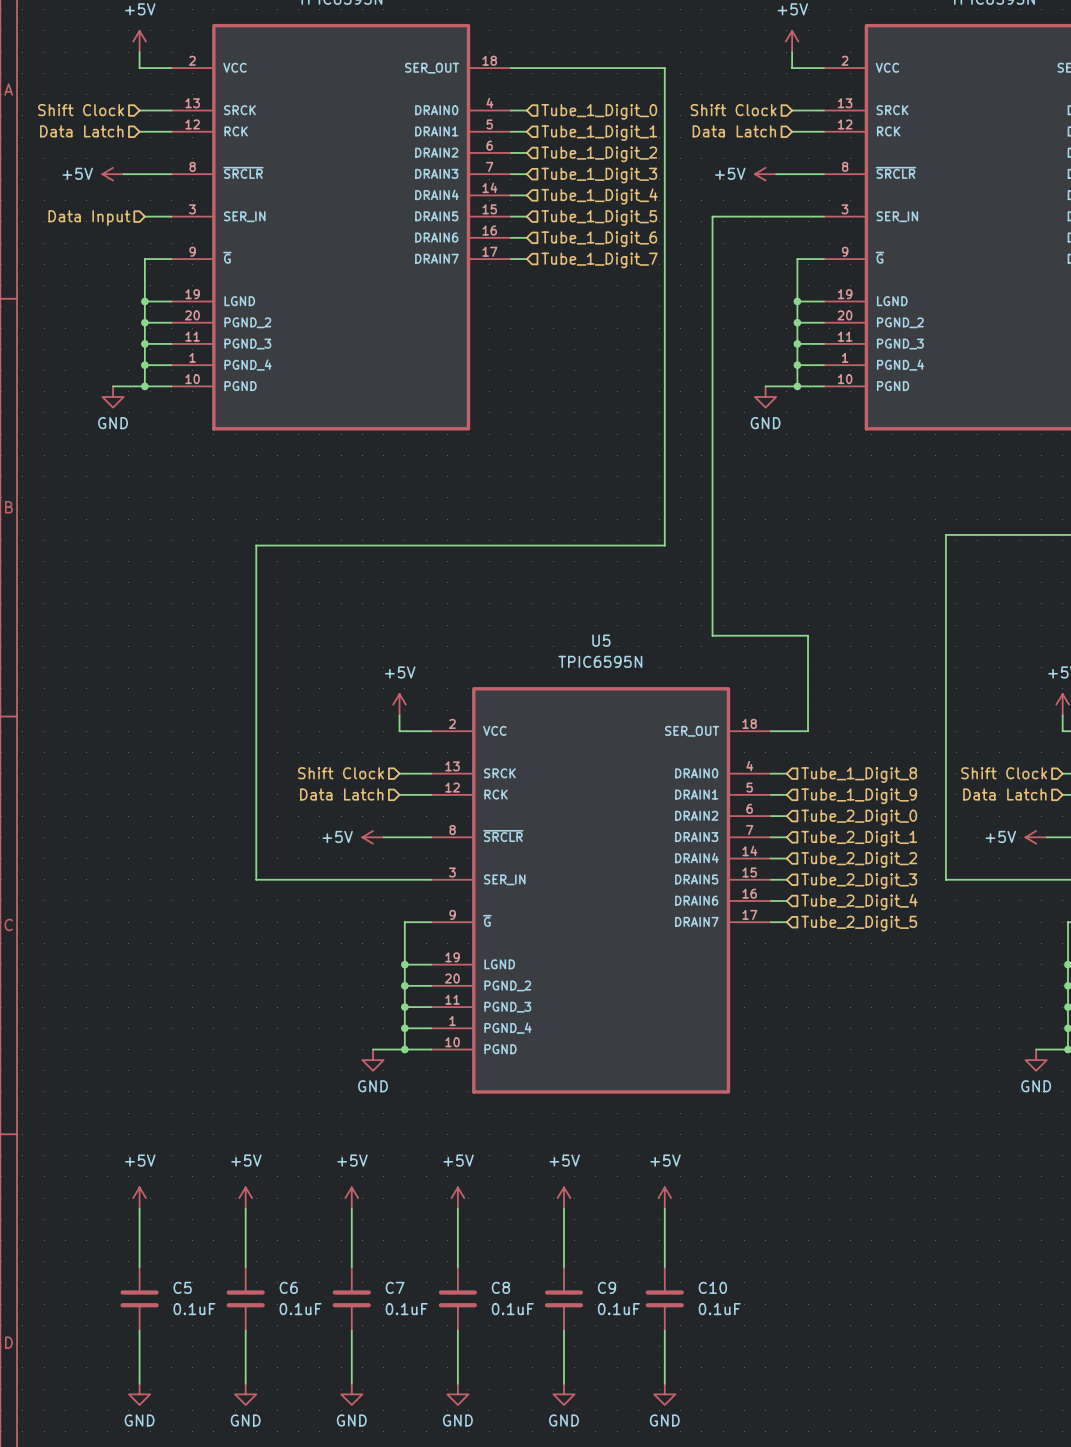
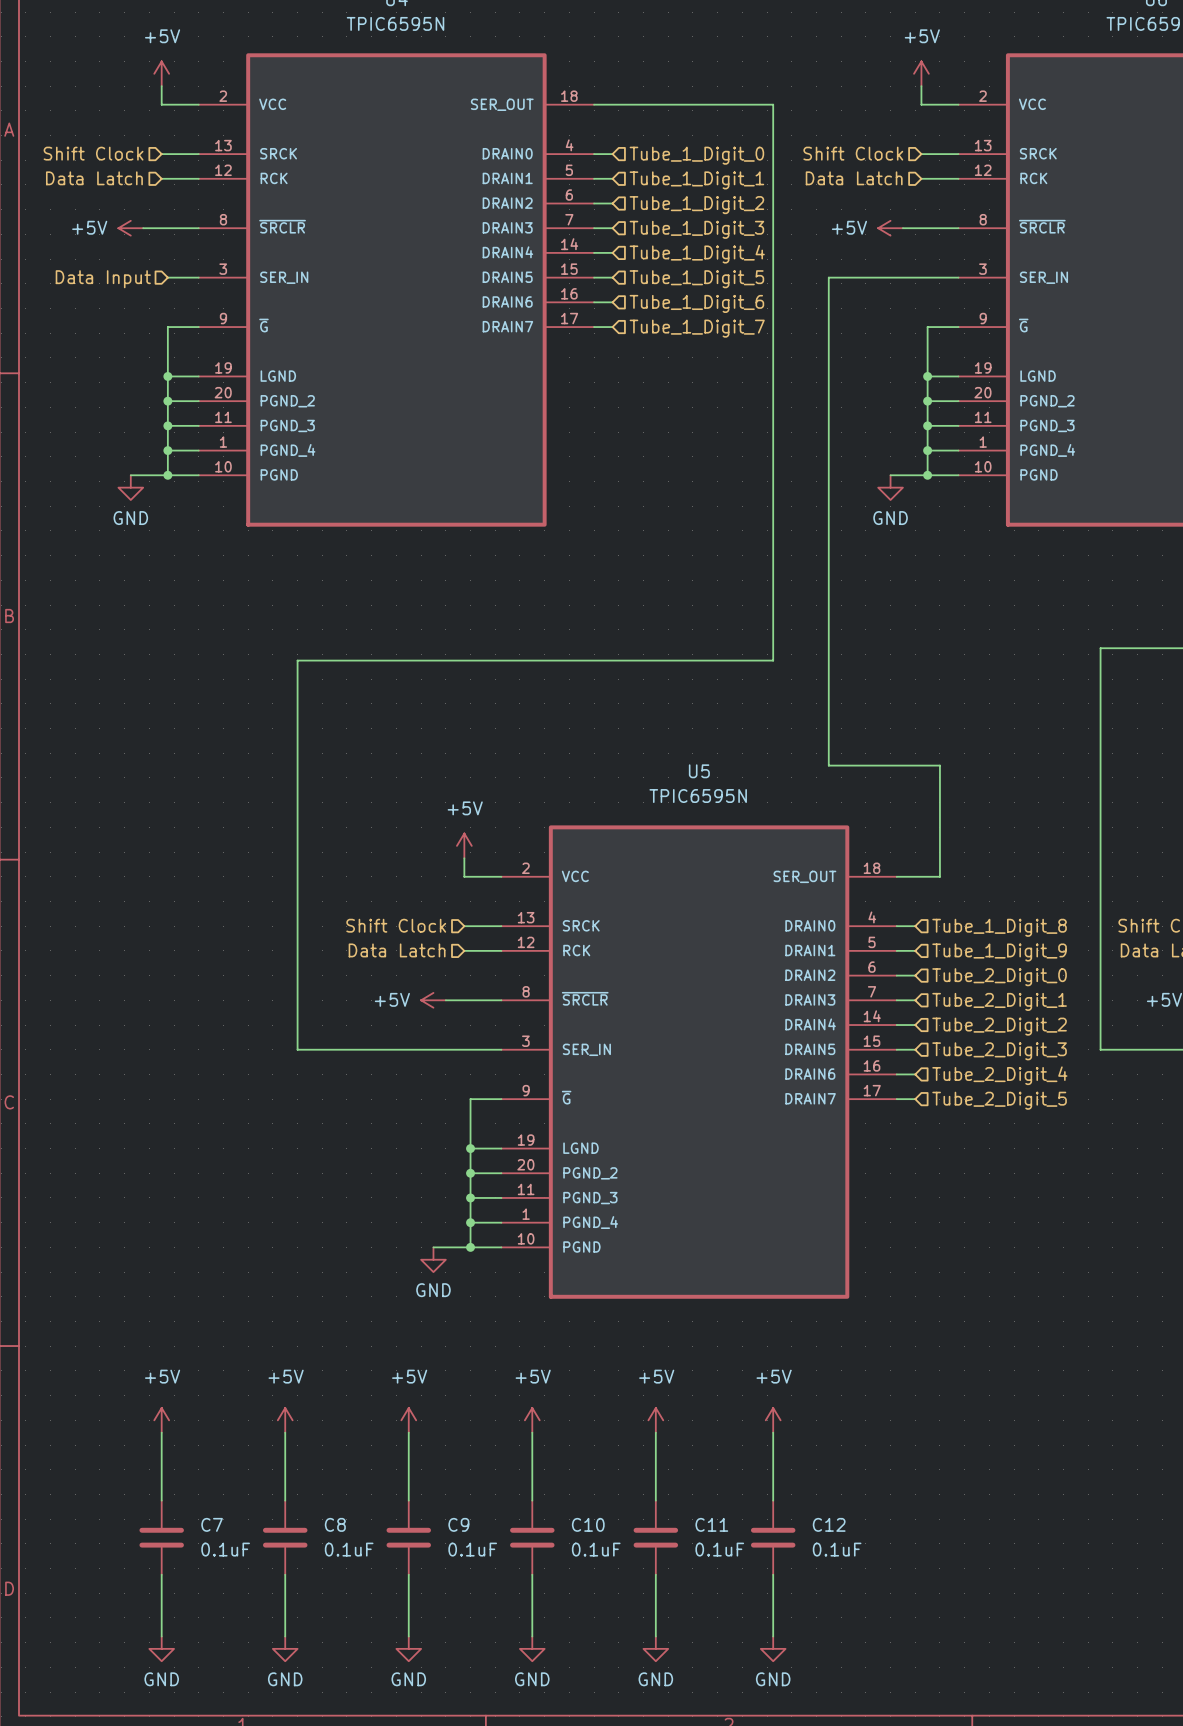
C5 name: C5 (182, 1287) -> C7 (212, 1524)
C6 name: C6 (288, 1287) -> C8 (335, 1524)
C7 name: C7 (395, 1287) -> C9 (458, 1524)
C8 name: C8 (500, 1287) -> C10 (588, 1524)
C9 name: C9 (607, 1287) -> C11 (711, 1524)
C10 name: C10 (712, 1287) -> C12 (829, 1524)

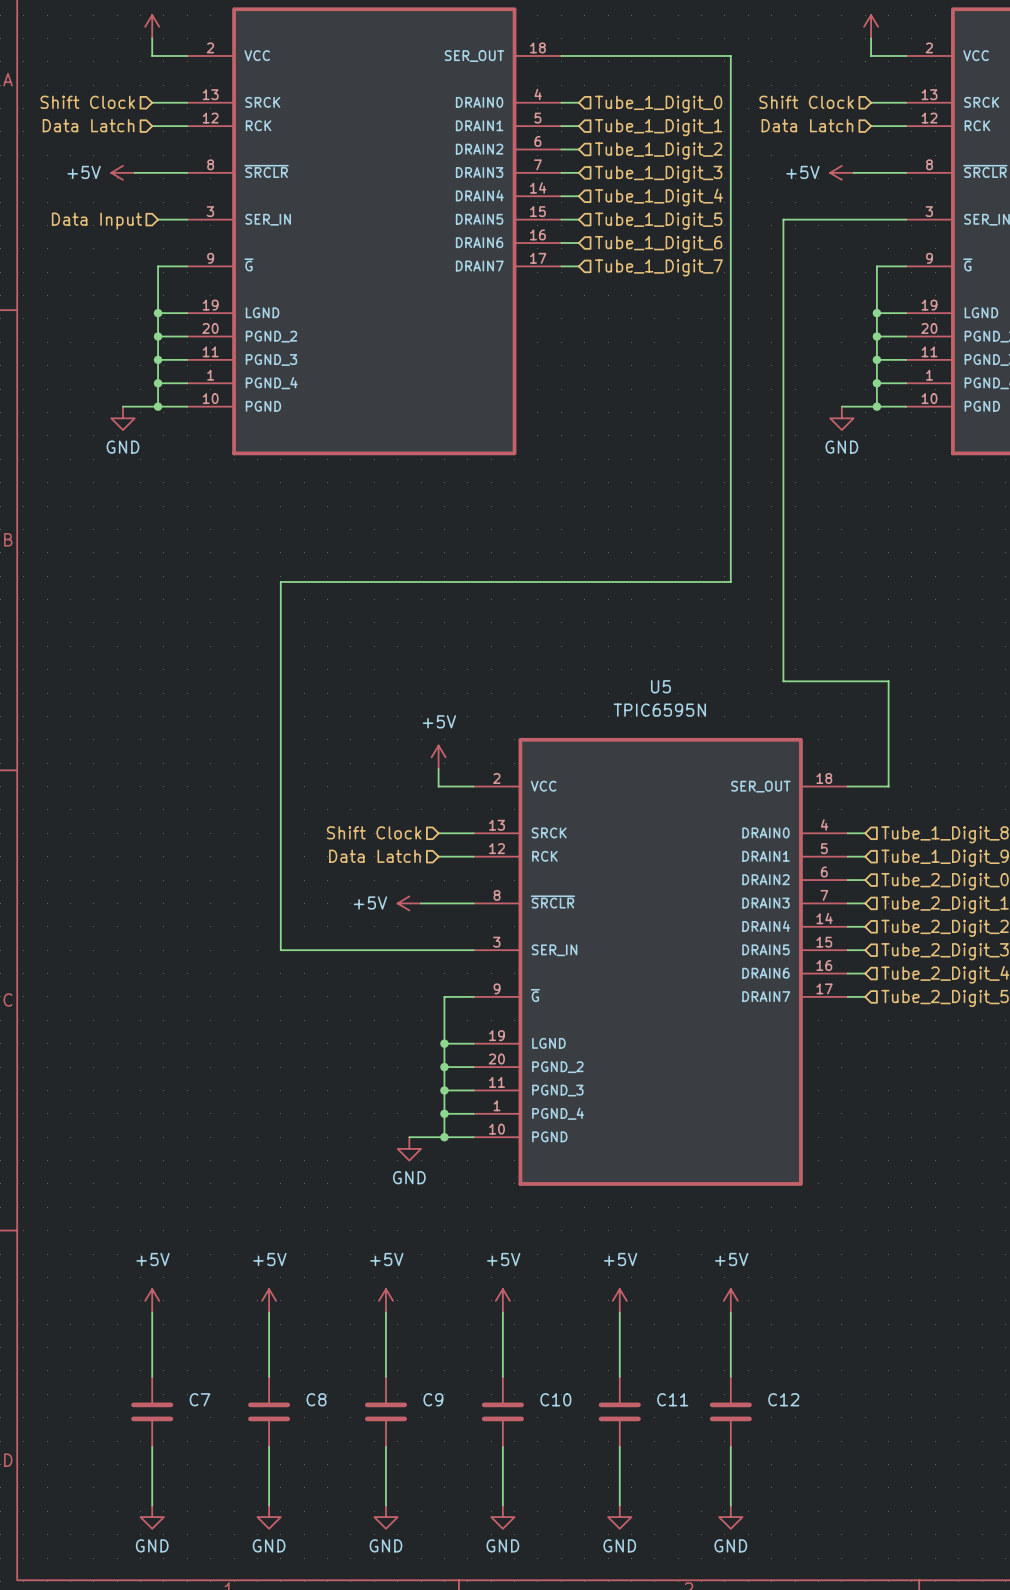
C7 value: 0.1uF (225, 1549) -> none
C8 value: 0.1uF (349, 1549) -> none
C9 value: 0.1uF (472, 1549) -> none
C10 value: 0.1uF (596, 1549) -> none
C11 value: 0.1uF (719, 1549) -> none
C12 value: 0.1uF (837, 1549) -> none

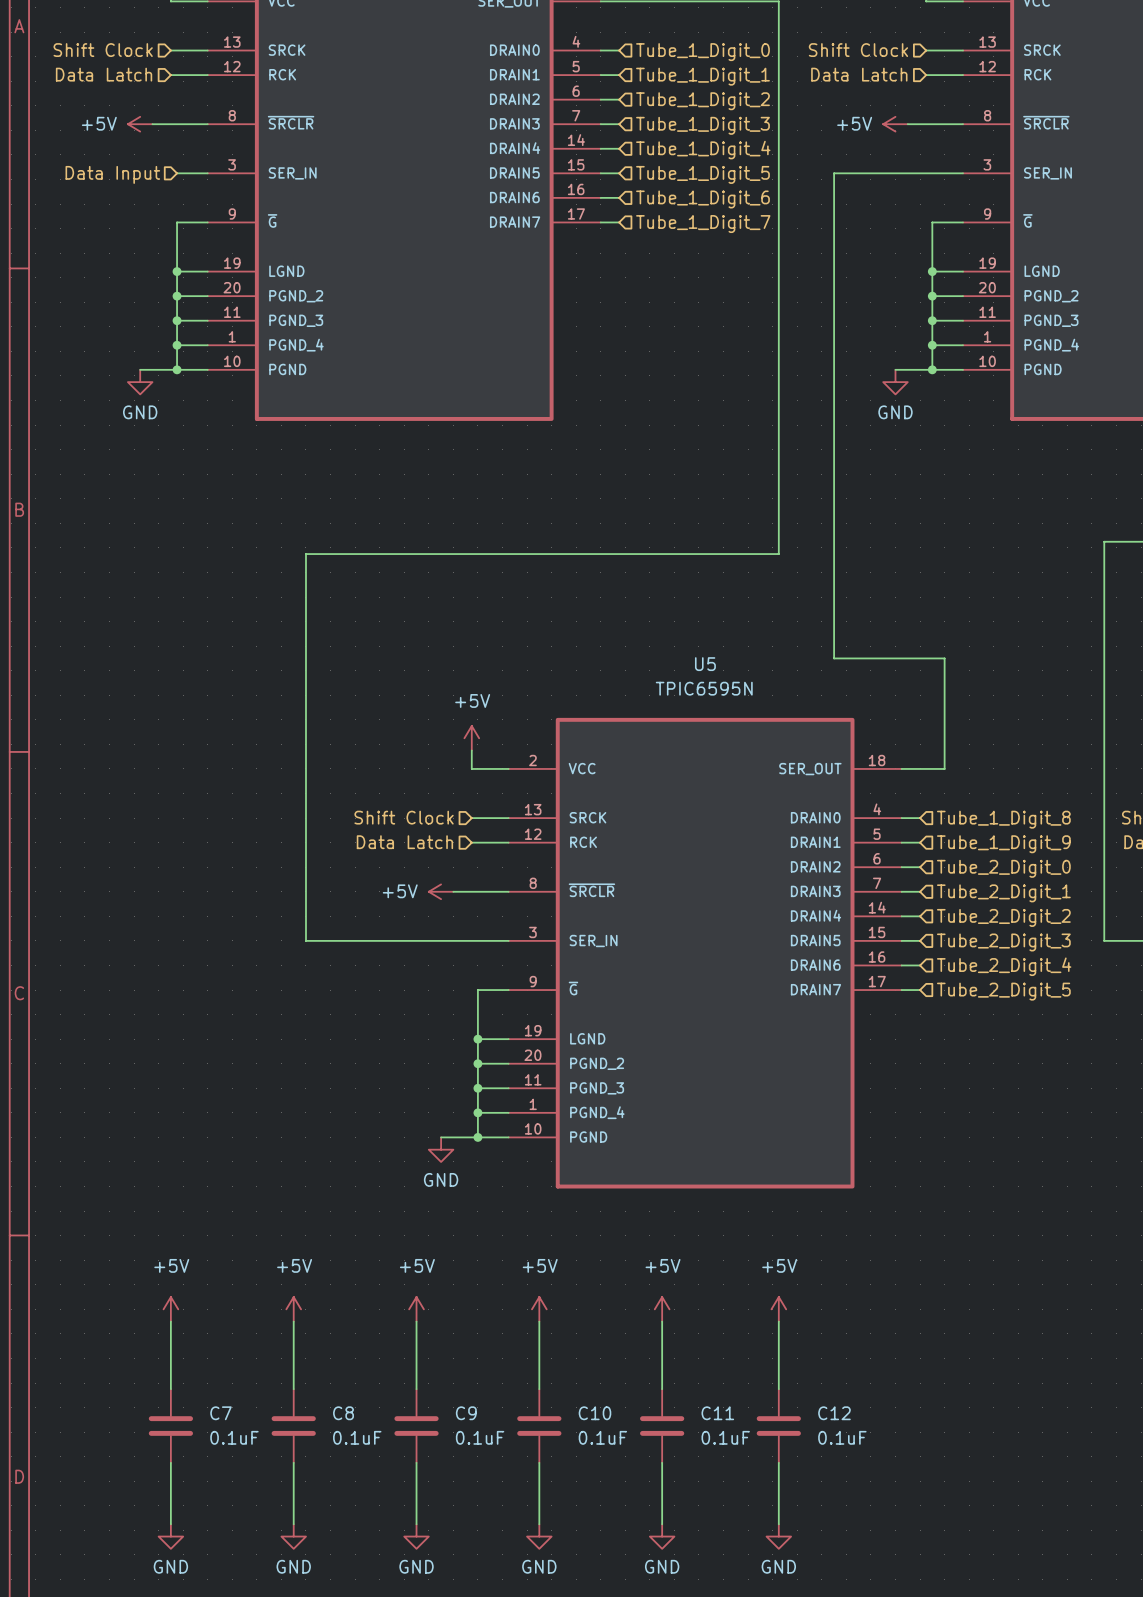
C7 value: none -> 0.1uF (234, 1437)
C8 value: none -> 0.1uF (357, 1437)
C9 value: none -> 0.1uF (480, 1437)
C10 value: none -> 0.1uF (602, 1437)
C11 value: none -> 0.1uF (725, 1437)
C12 value: none -> 0.1uF (842, 1437)

